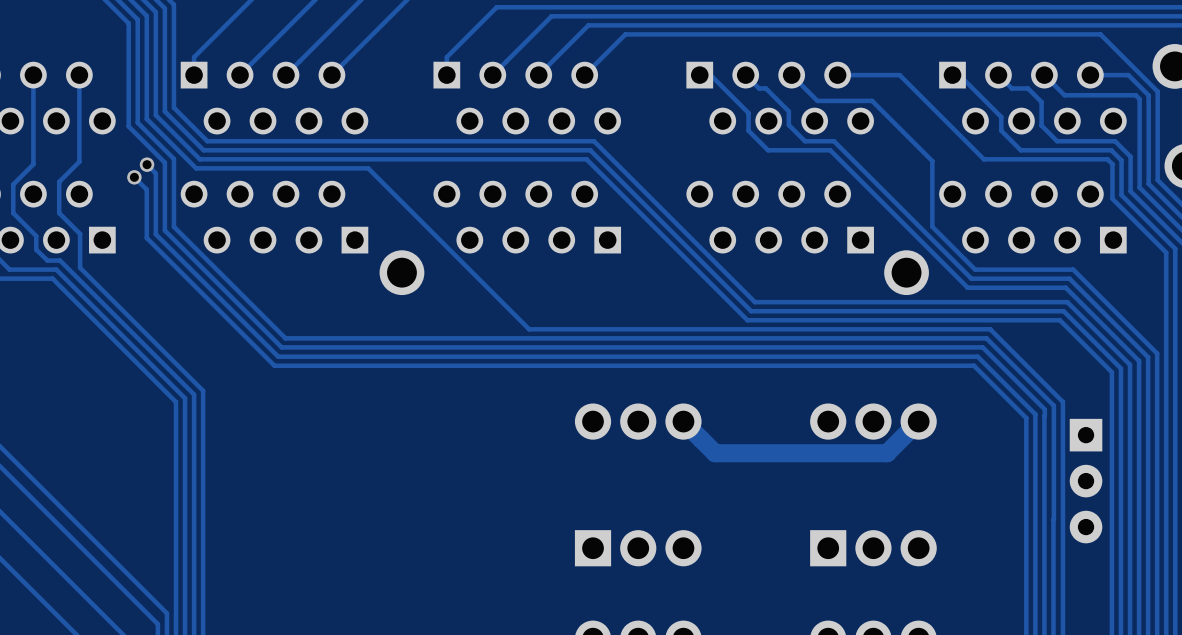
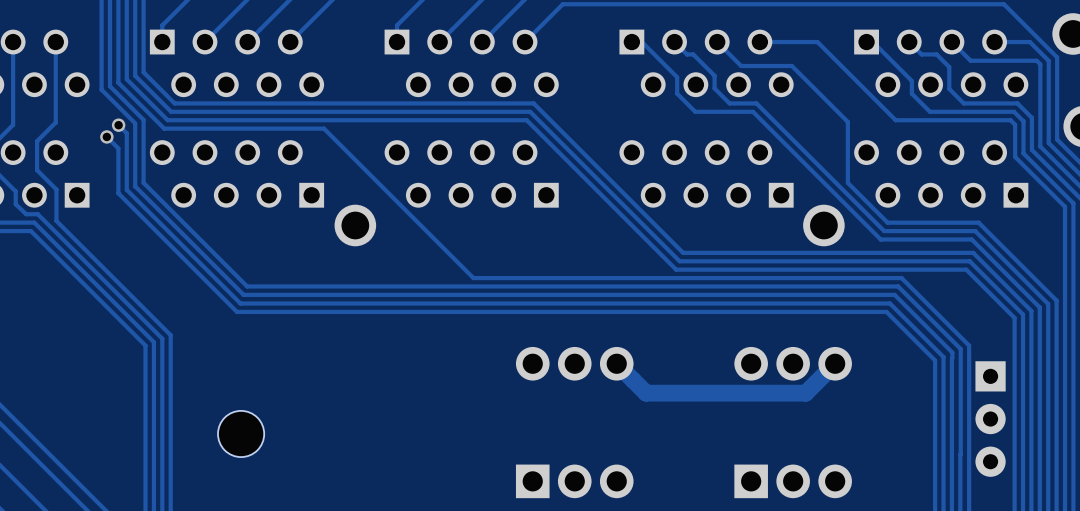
part: none -> (241, 433)

